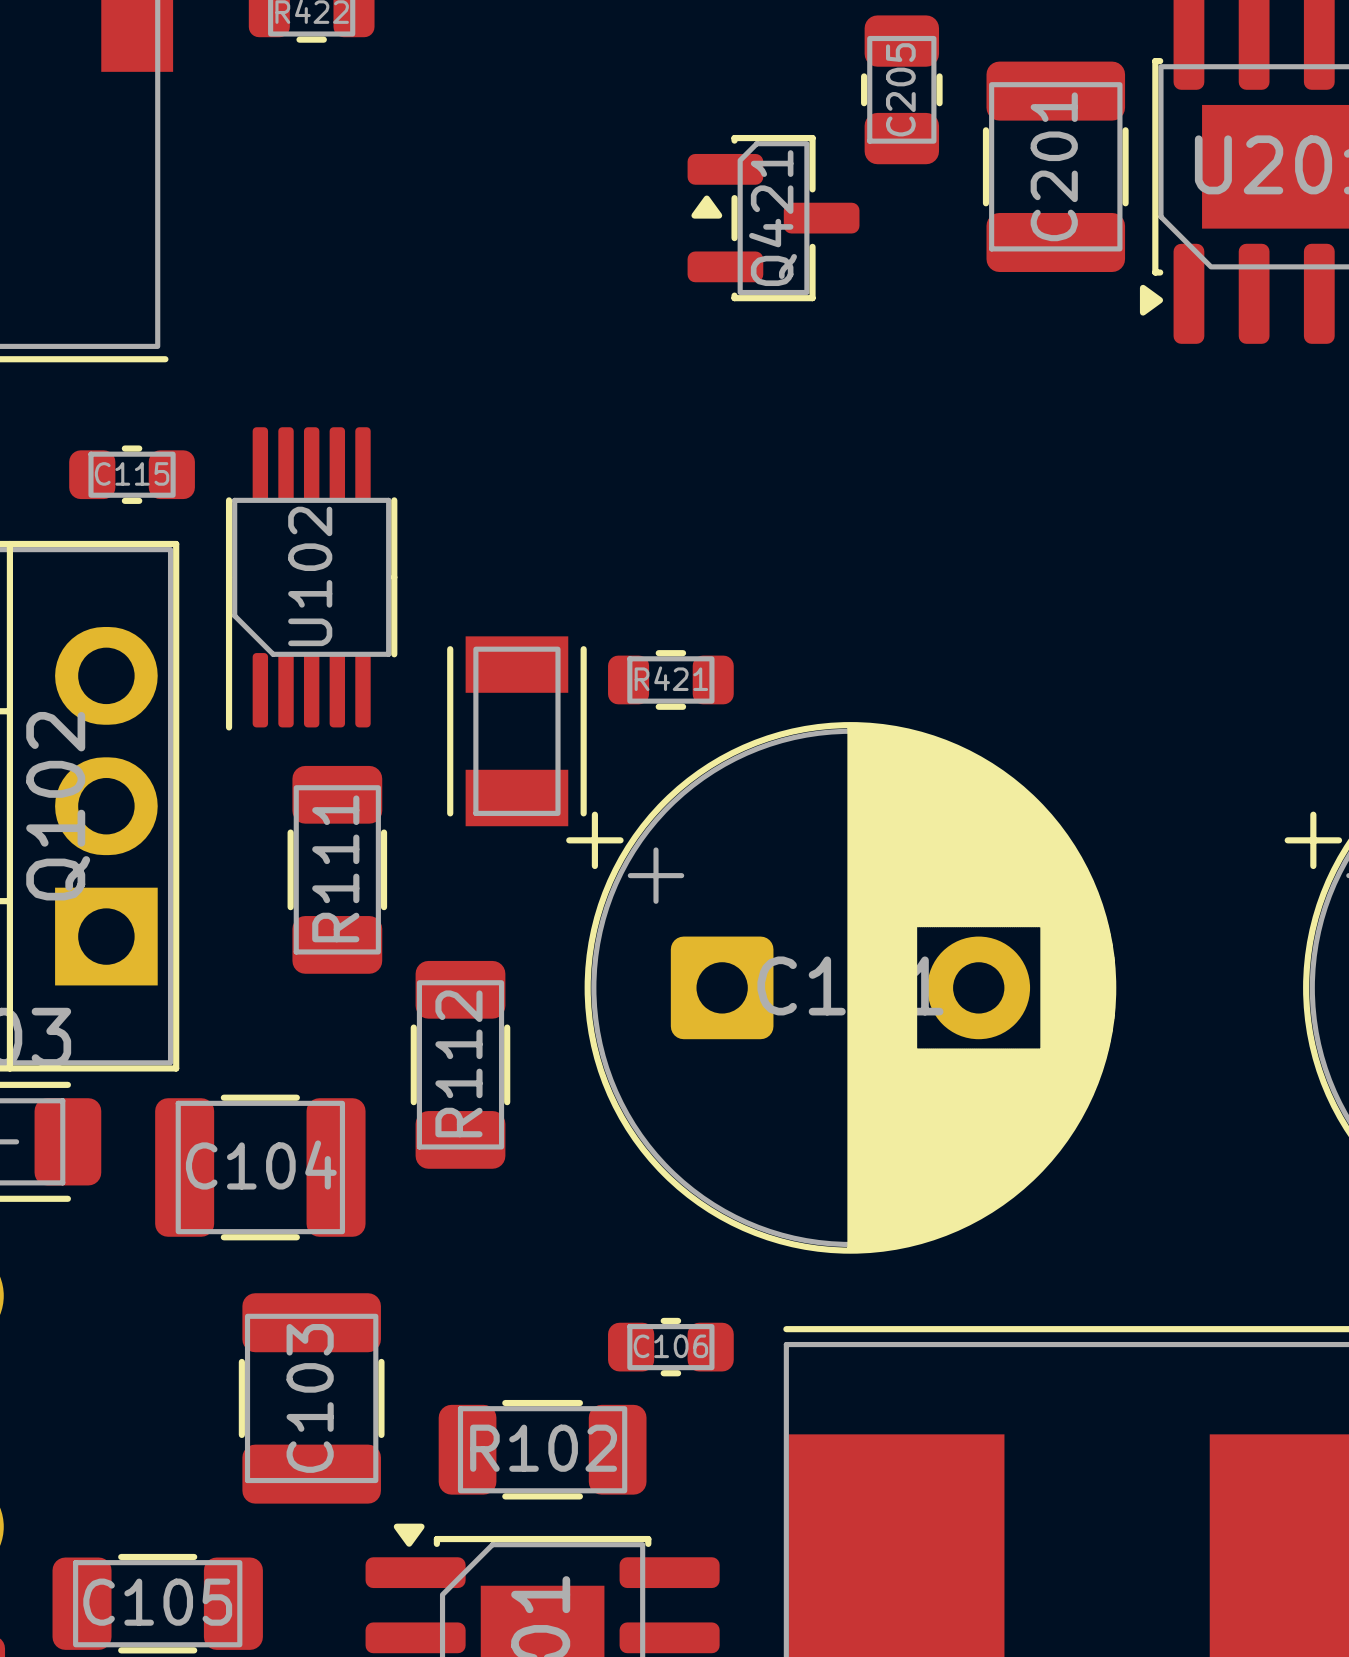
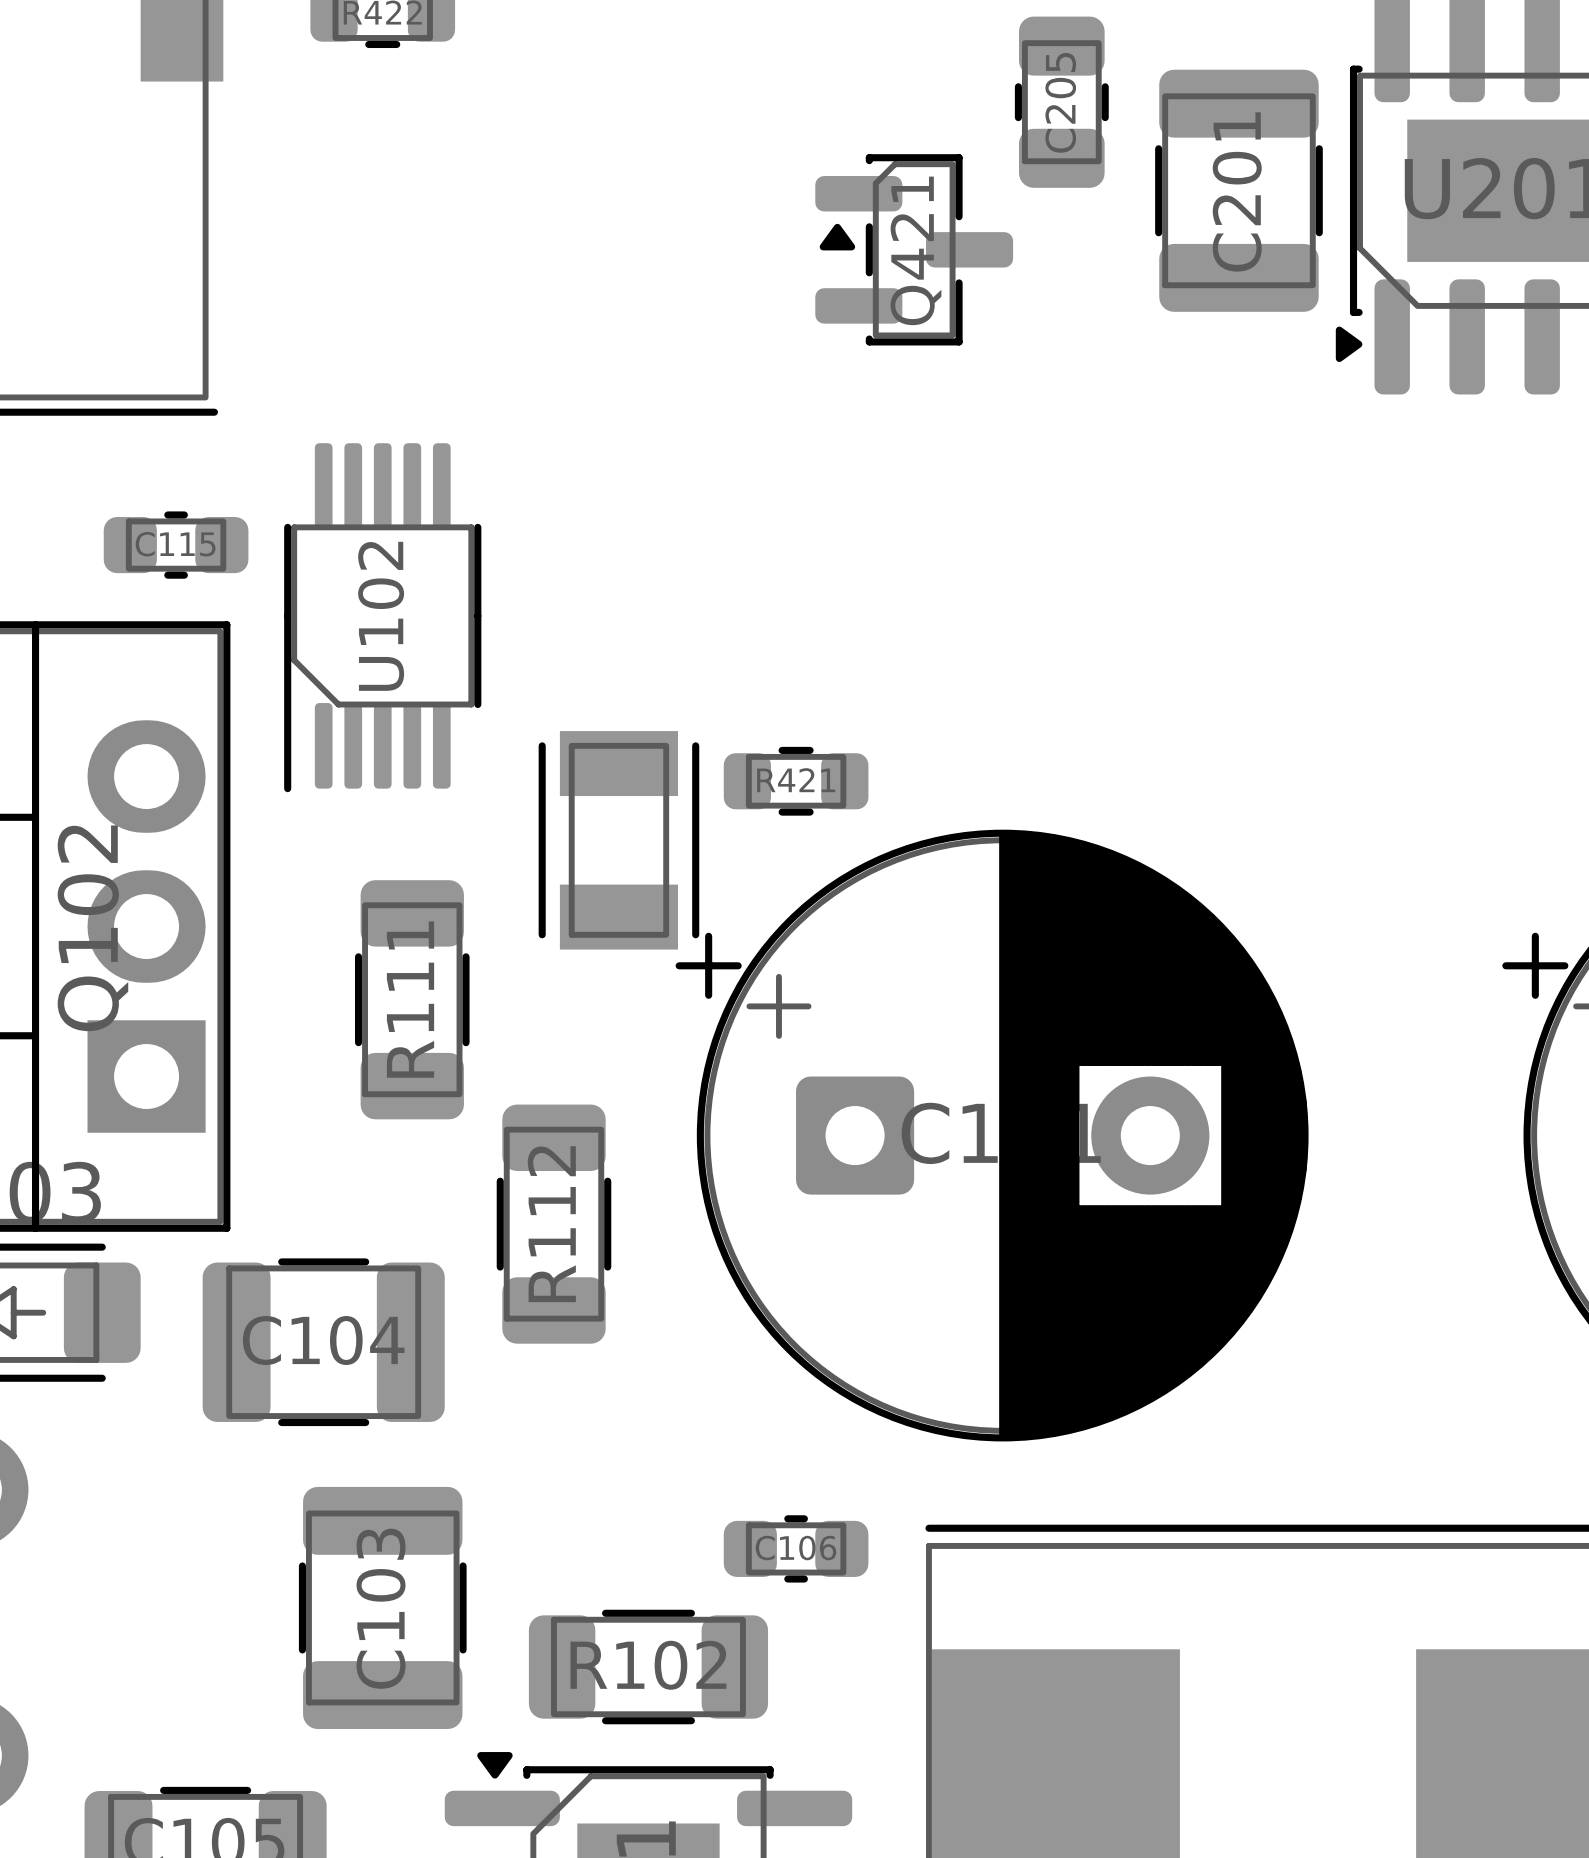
U102 position: (311, 578) -> (382, 617)

